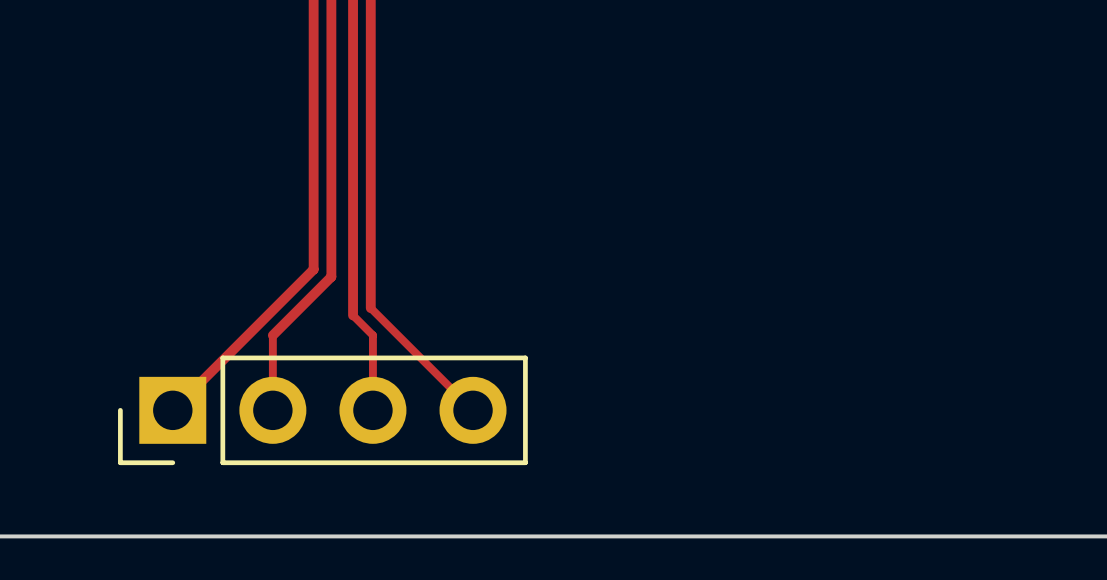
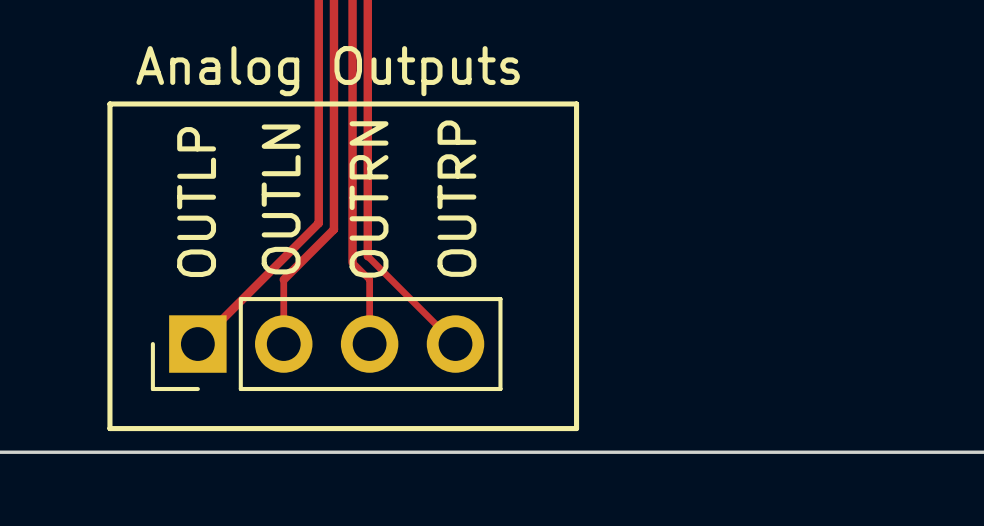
text: none -> Analog Outputs (328, 71)
line: none -> (109, 103) (576, 103) (576, 428) (109, 428) (109, 103)
text: none -> OUTRP (456, 198)
text: none -> OUTLN (281, 199)
text: none -> OUTRN (369, 199)
text: none -> OUTLP (196, 202)

